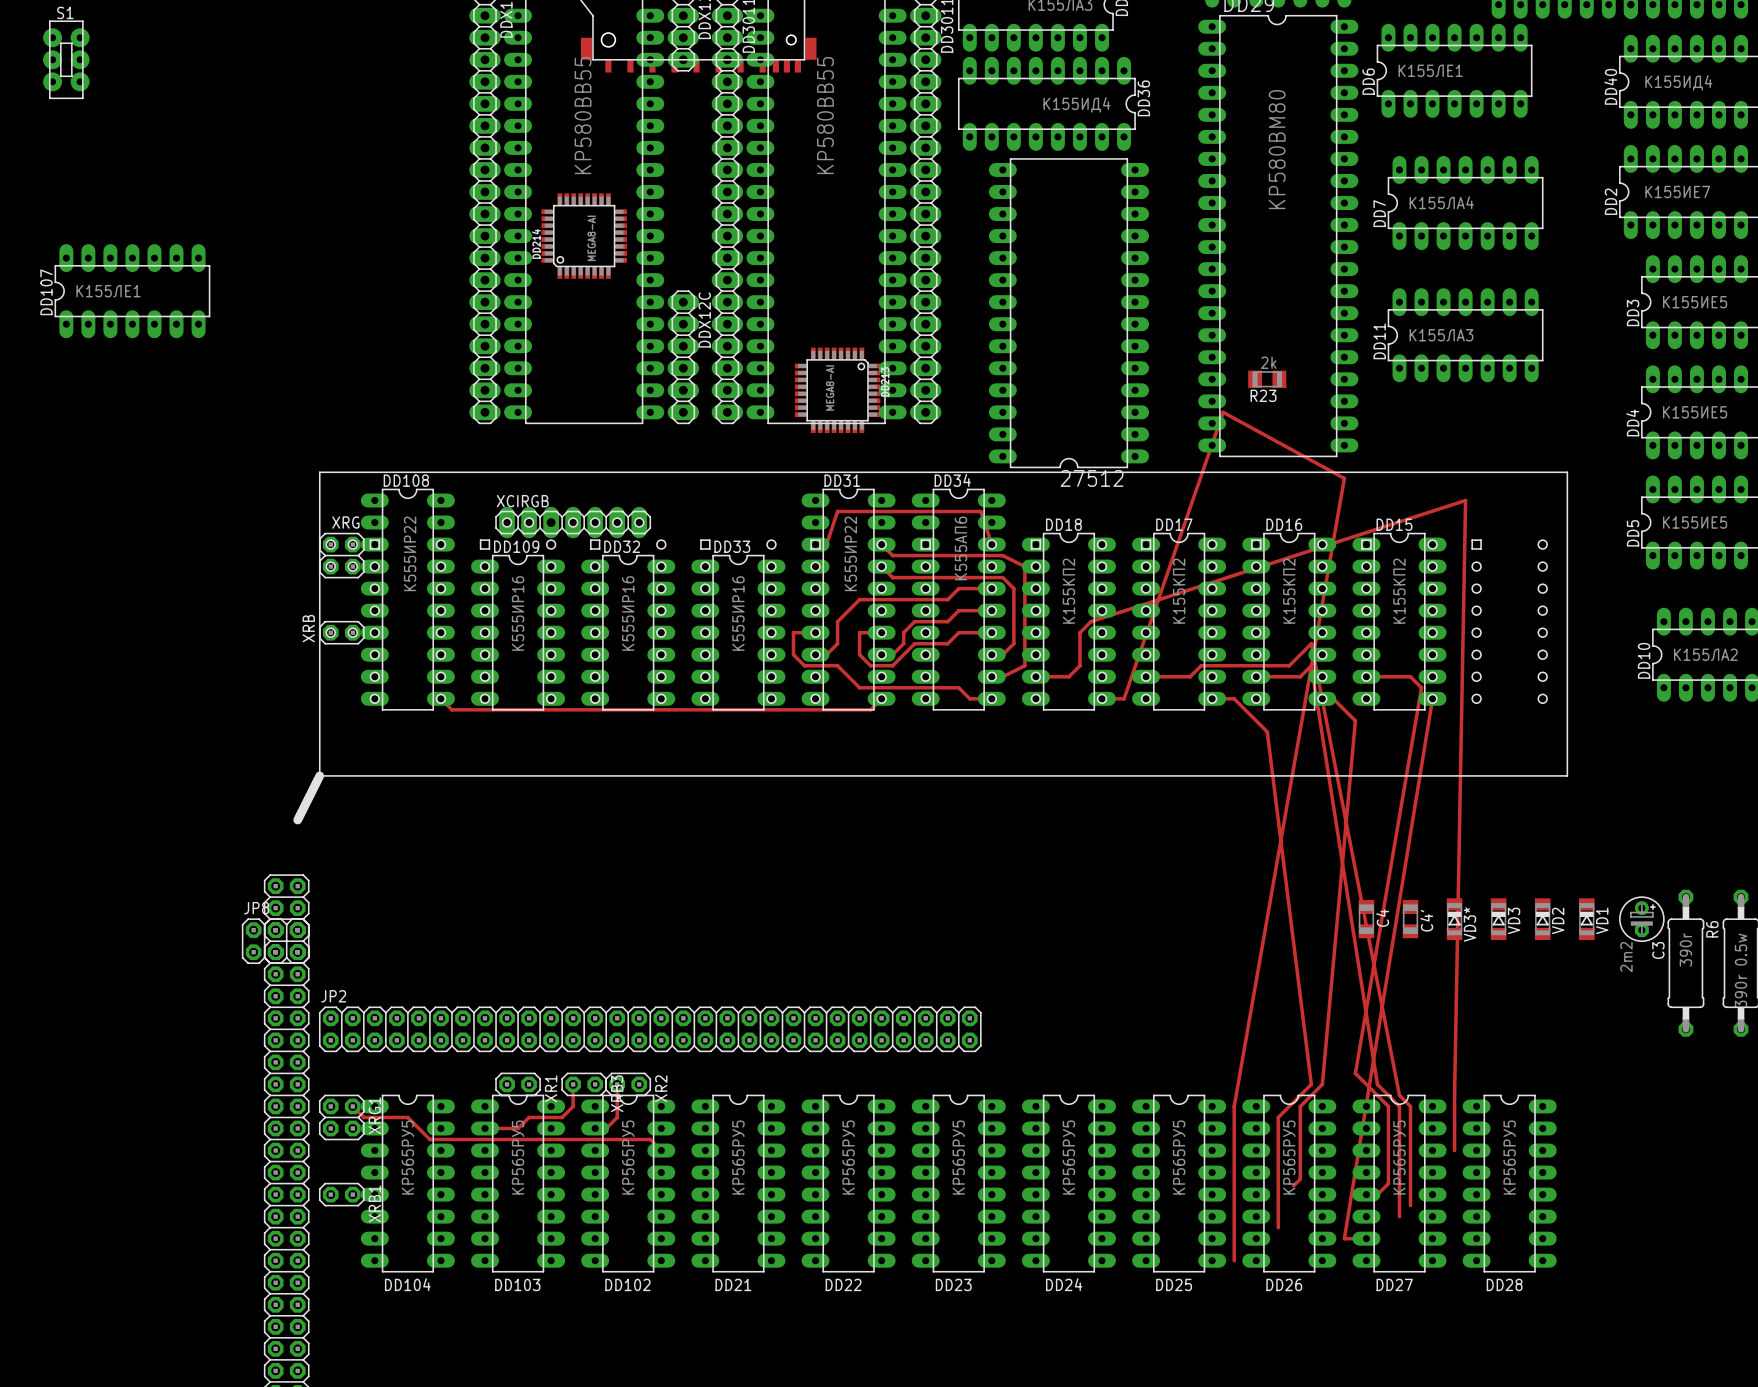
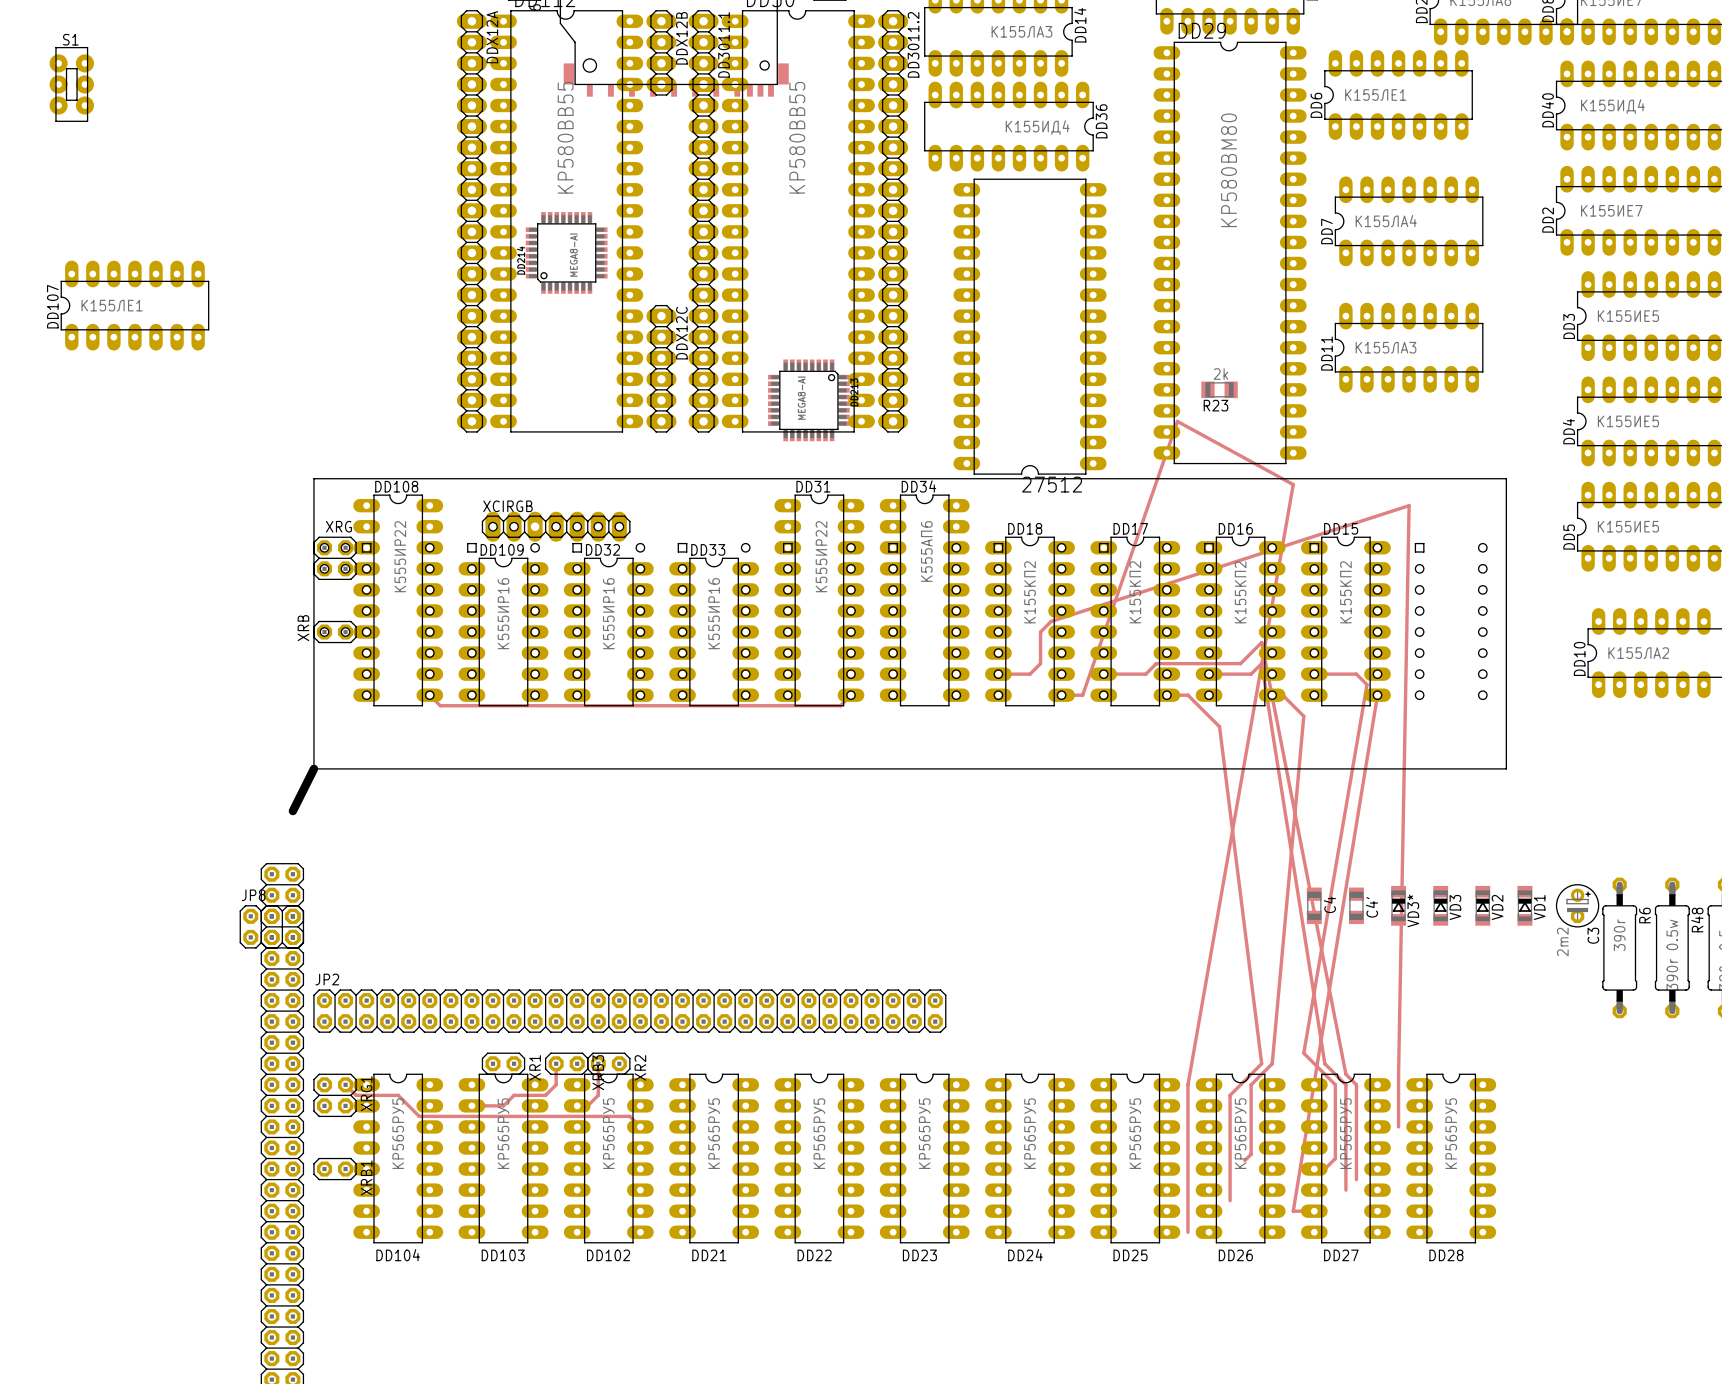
track: (815, 544) (826, 544) (837, 511) (980, 511) (991, 544) -> none
track: (881, 544) (892, 555) (1002, 555) (1024, 566) (1024, 665) (1002, 676) (991, 676) -> none
track: (881, 566) (892, 577) (1002, 577) (1013, 588) (1013, 643) (1002, 654) (991, 654) -> none
track: (991, 588) (958, 588) (947, 599) (859, 599) (837, 621) (837, 643) (826, 654) (815, 654) -> none
track: (991, 610) (958, 610) (947, 621) (914, 621) (903, 632) (903, 643) (892, 654) (881, 654) -> none
track: (815, 632) (793, 632) (793, 654) (804, 665) (837, 665) (859, 687) (958, 687) (969, 698) (991, 698) -> none
track: (881, 632) (859, 632) (859, 654) (870, 665) (892, 665) (914, 643) (947, 643) (958, 632) (991, 632) -> none

